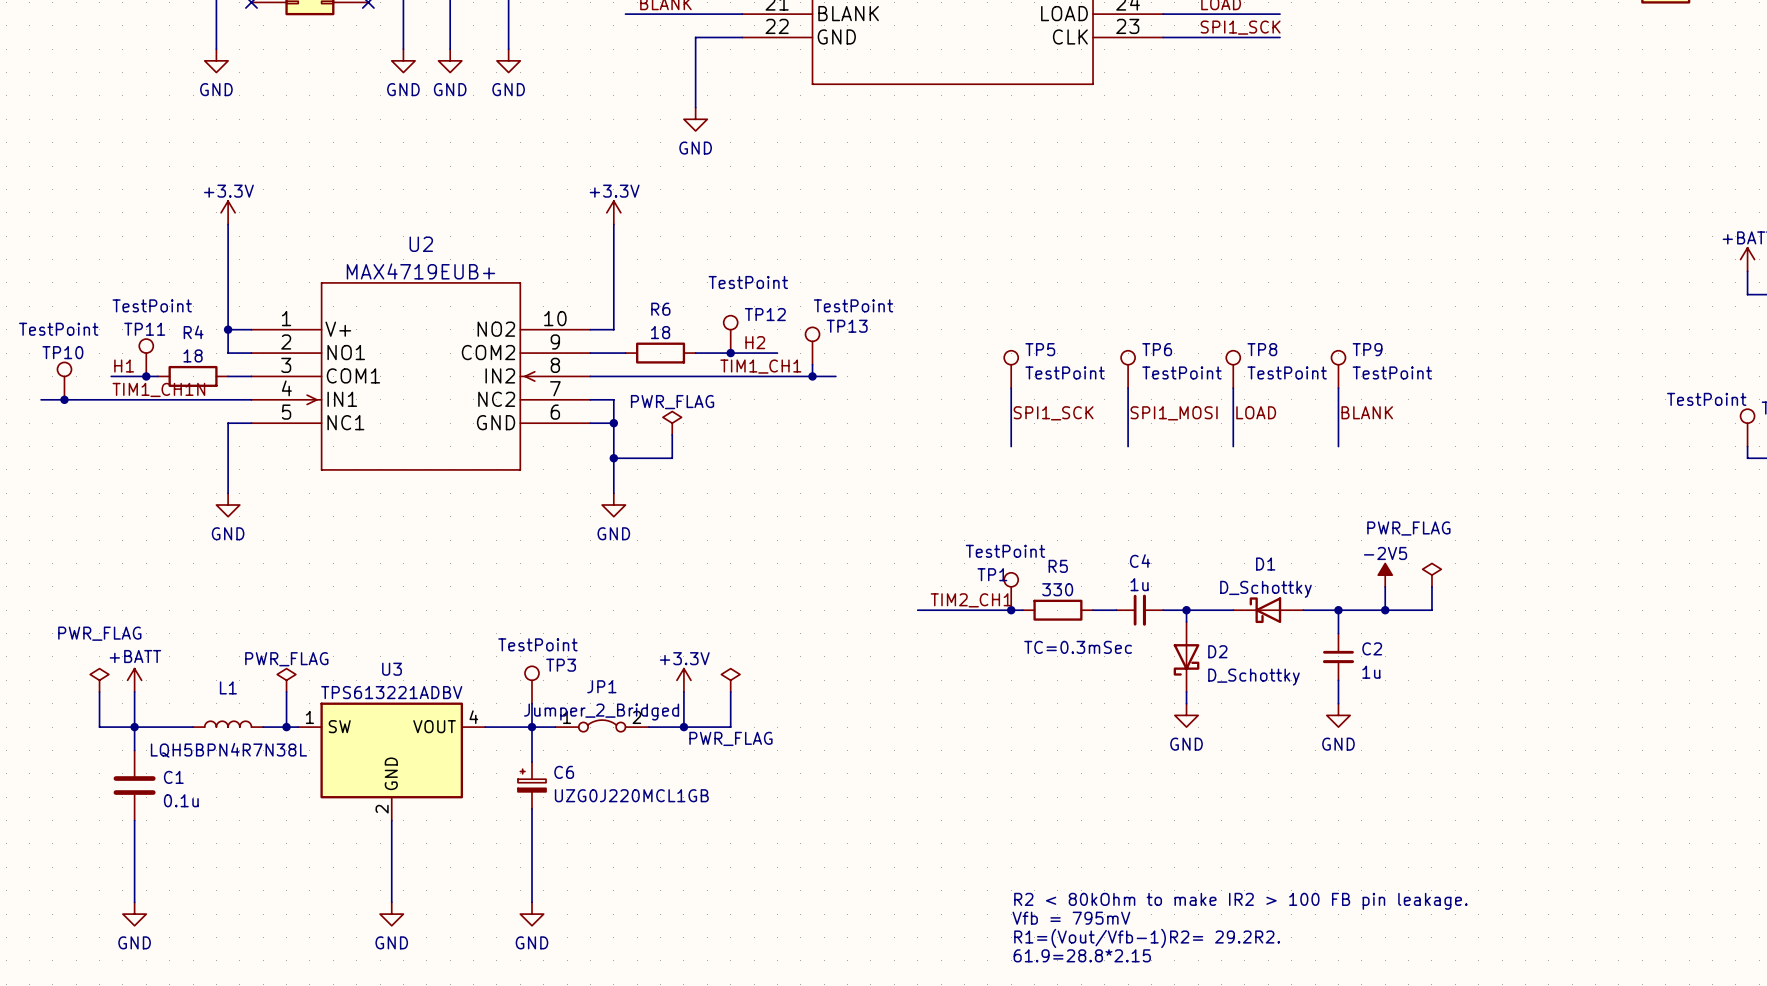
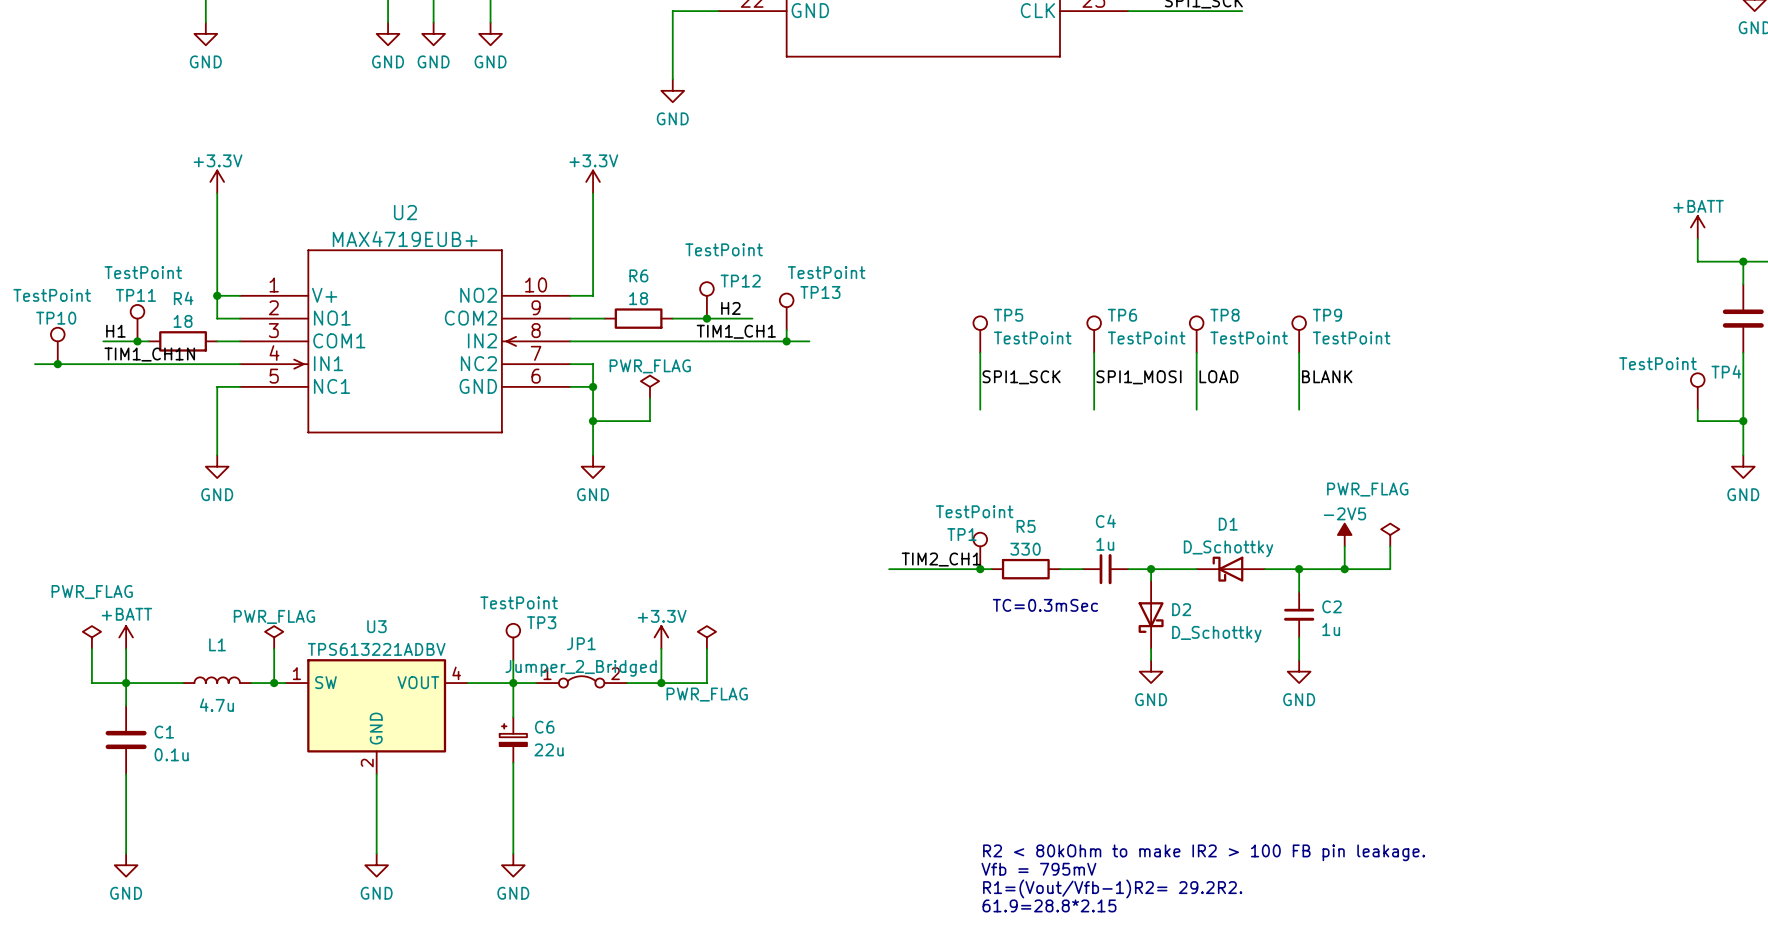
L1 value: LQH5BPN4R7N38L (228, 750) -> 4.7u (216, 705)
C6 value: UZG0J220MCL1GB (631, 795) -> 22u (549, 749)

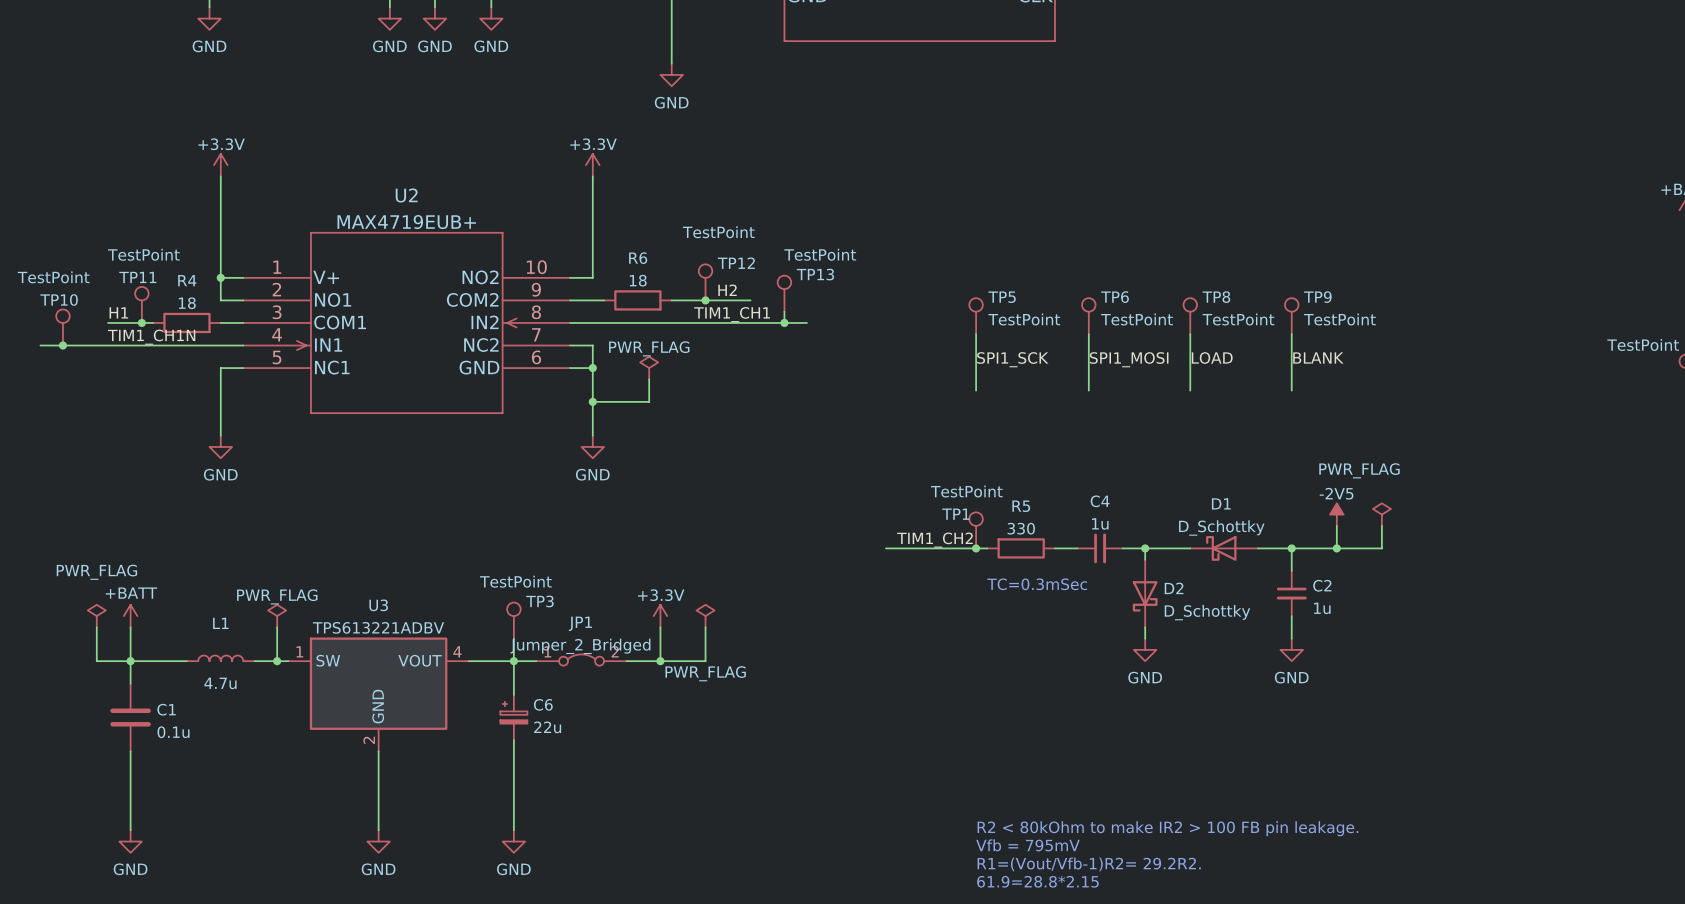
label: TIM2_CH1 (941, 559) -> TIM1_CH2 (934, 540)

